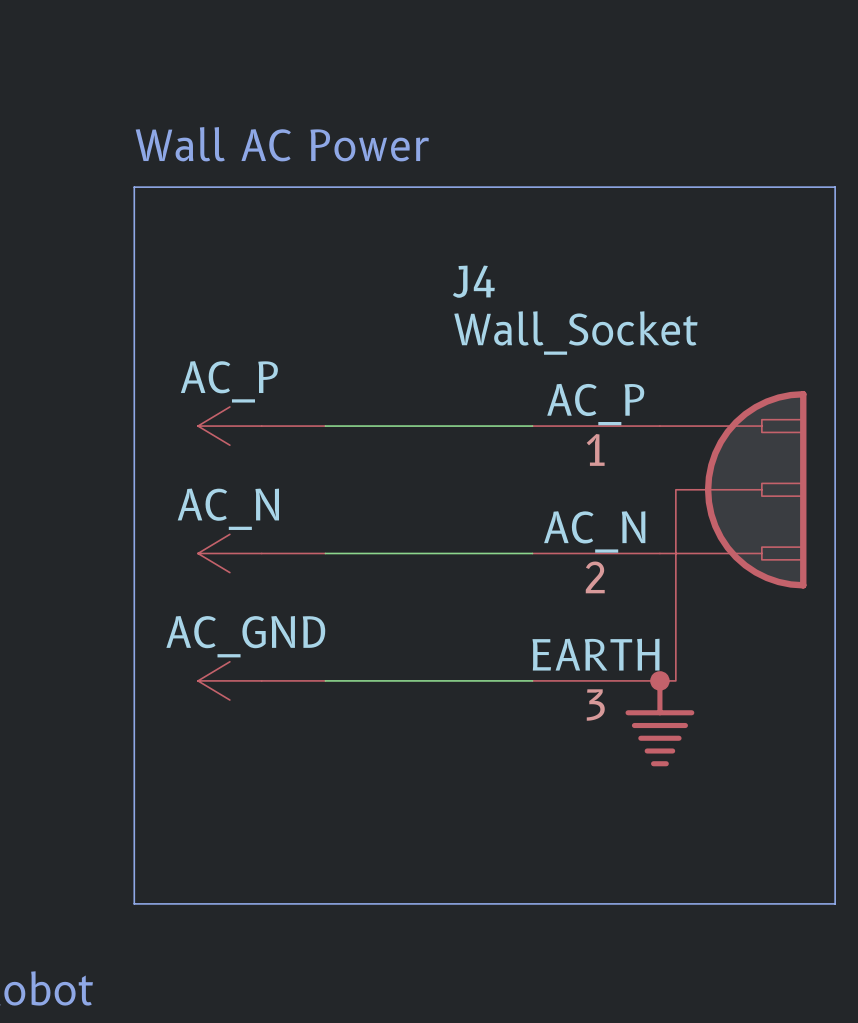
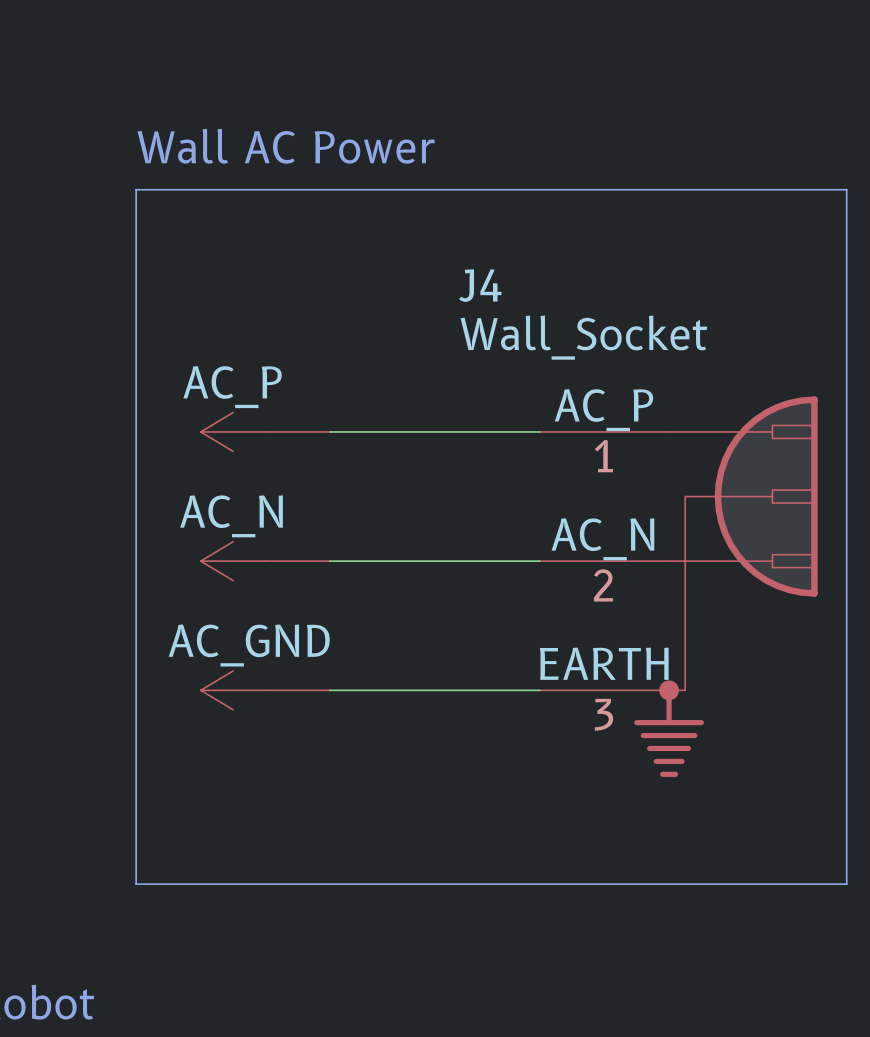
line: (134, 872) (134, 903) (835, 903) (835, 872) -> (136, 884) (846, 884)

